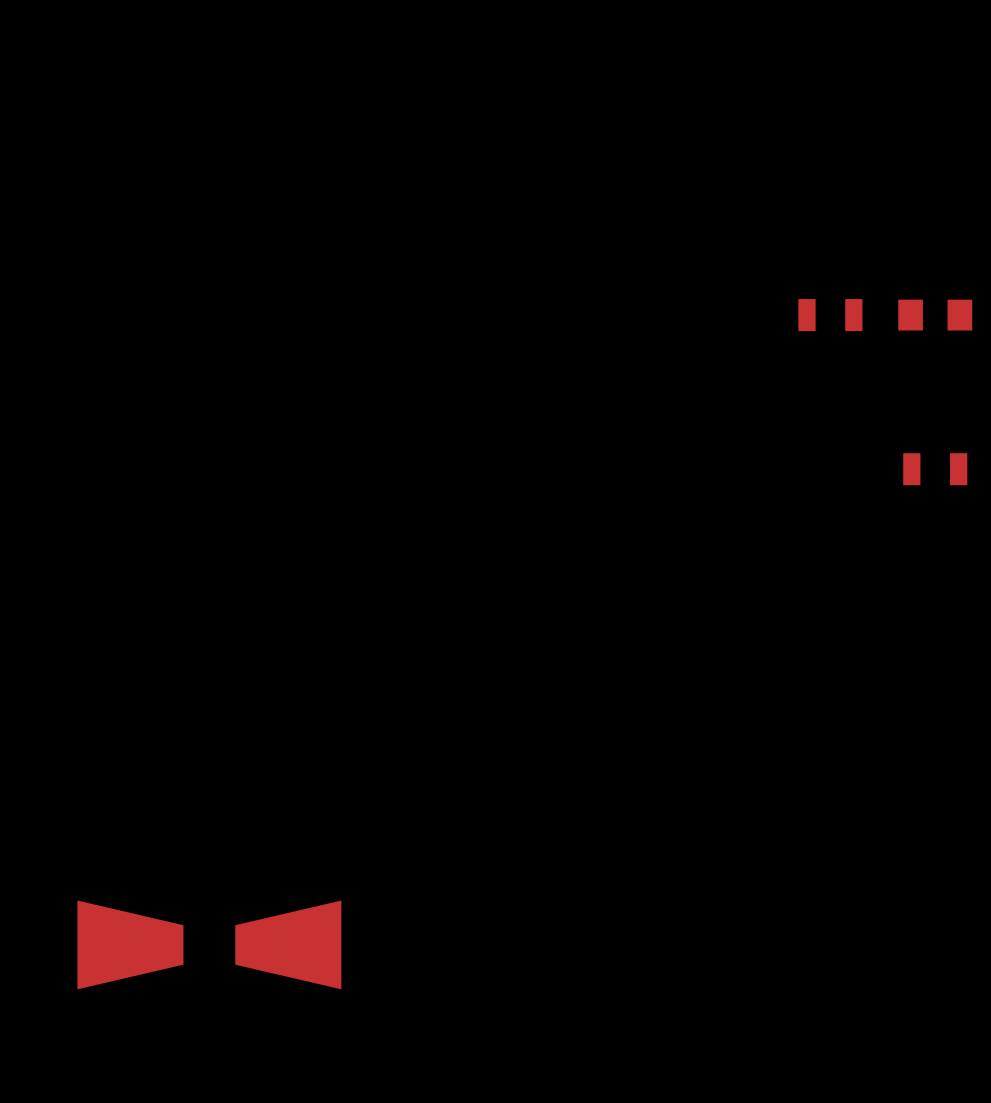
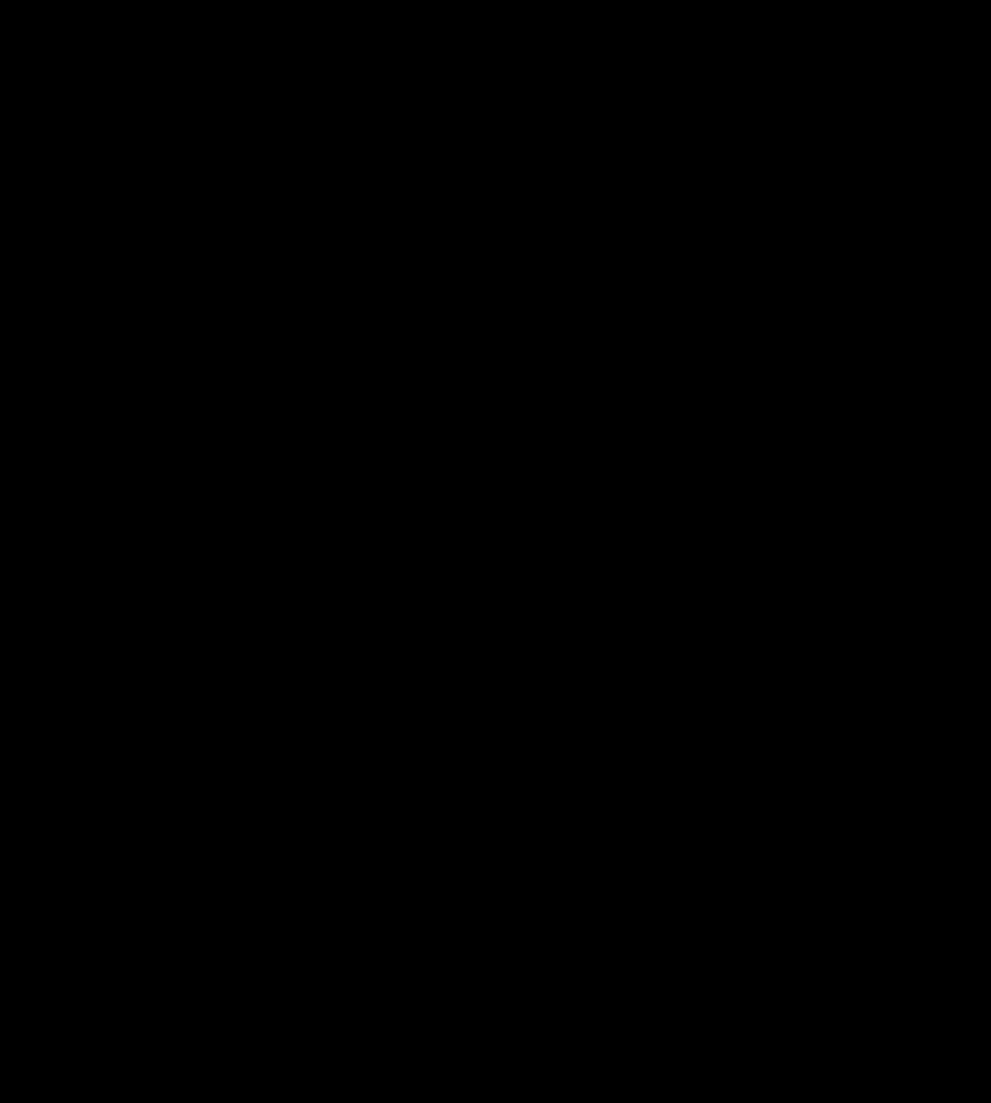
part: (830, 315) -> none
part: (935, 315) -> none
part: (935, 469) -> none
part: (209, 944) -> none

